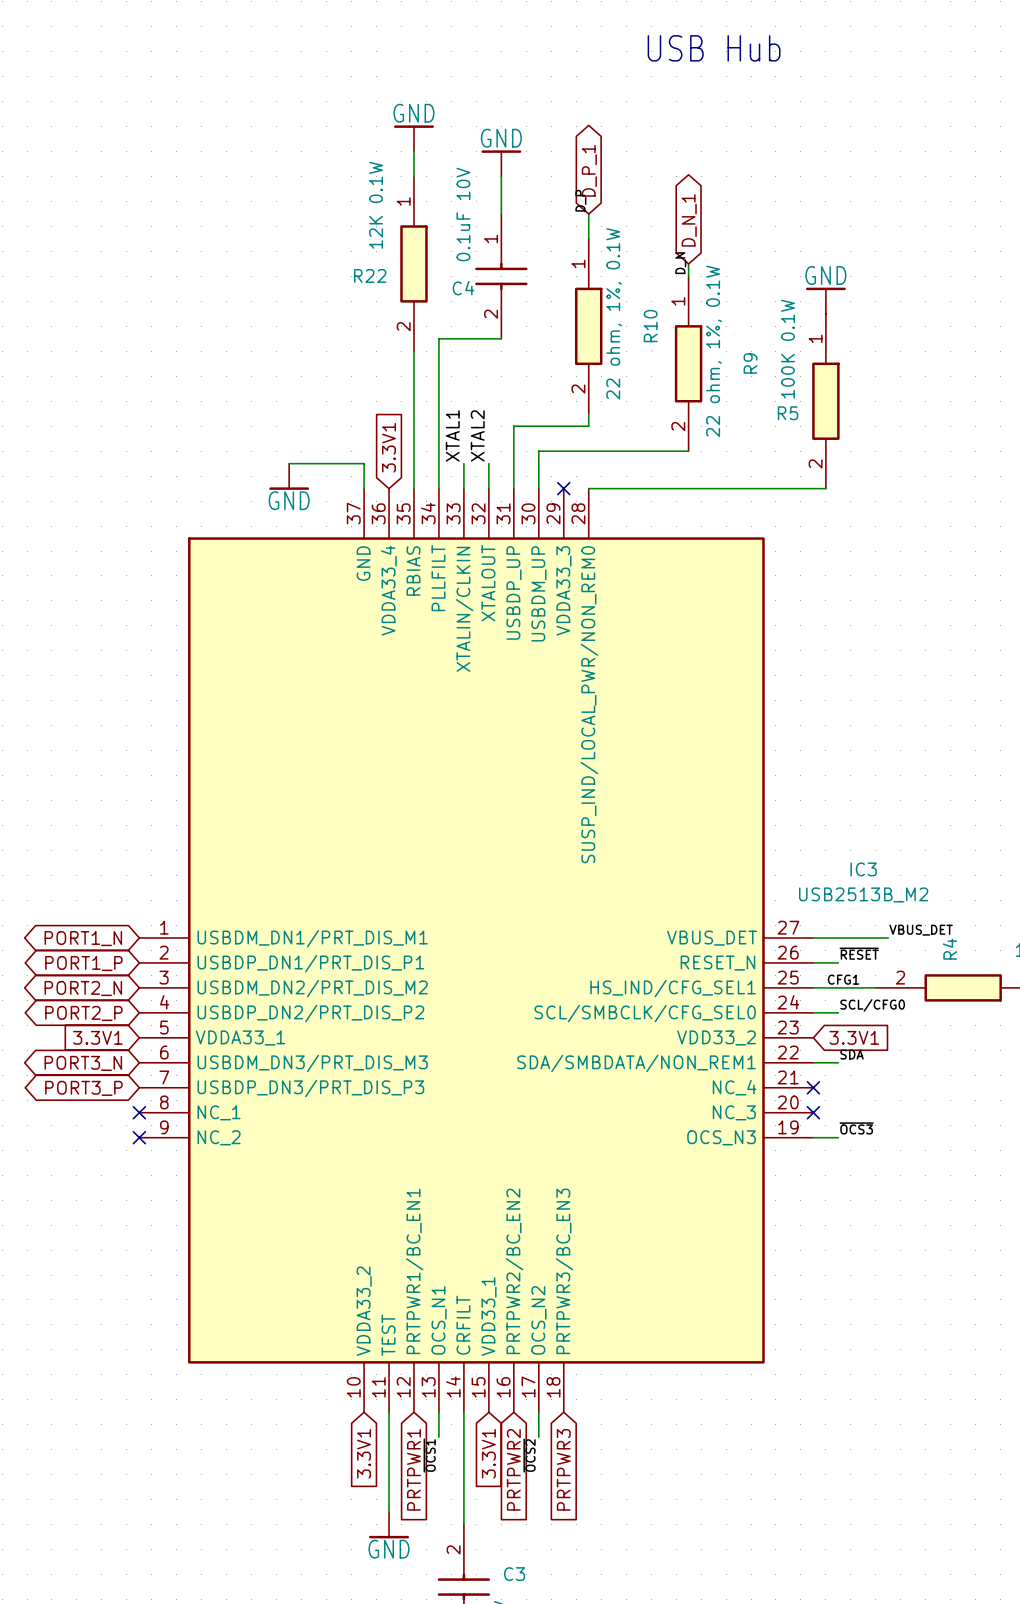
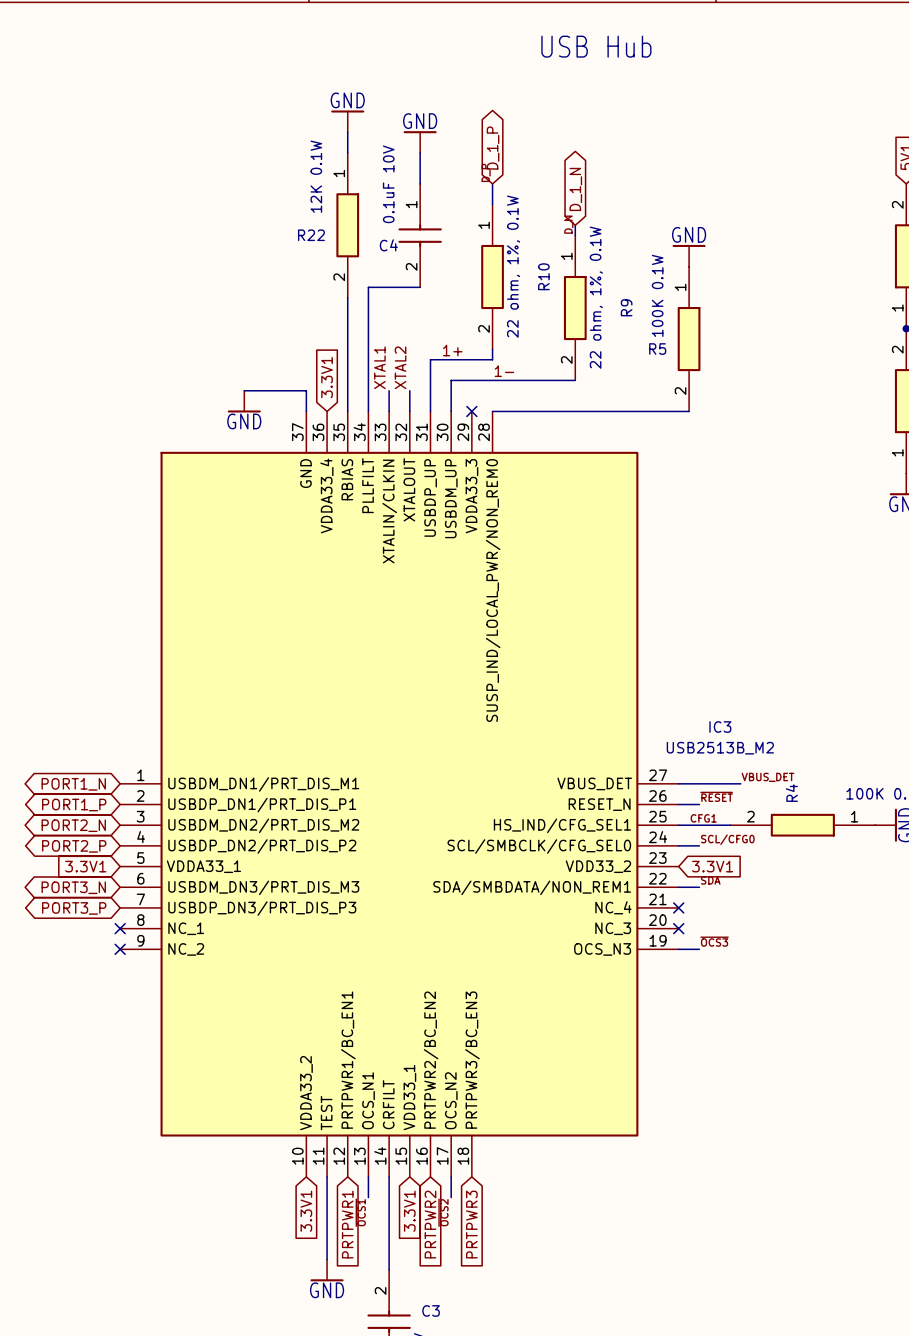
global label: D_P_1 (589, 170) -> D_1_P (493, 148)
global label: D_N_1 (689, 220) -> D_1_N (575, 189)
label: none -> 1+ (452, 350)
label: none -> 1- (504, 371)

